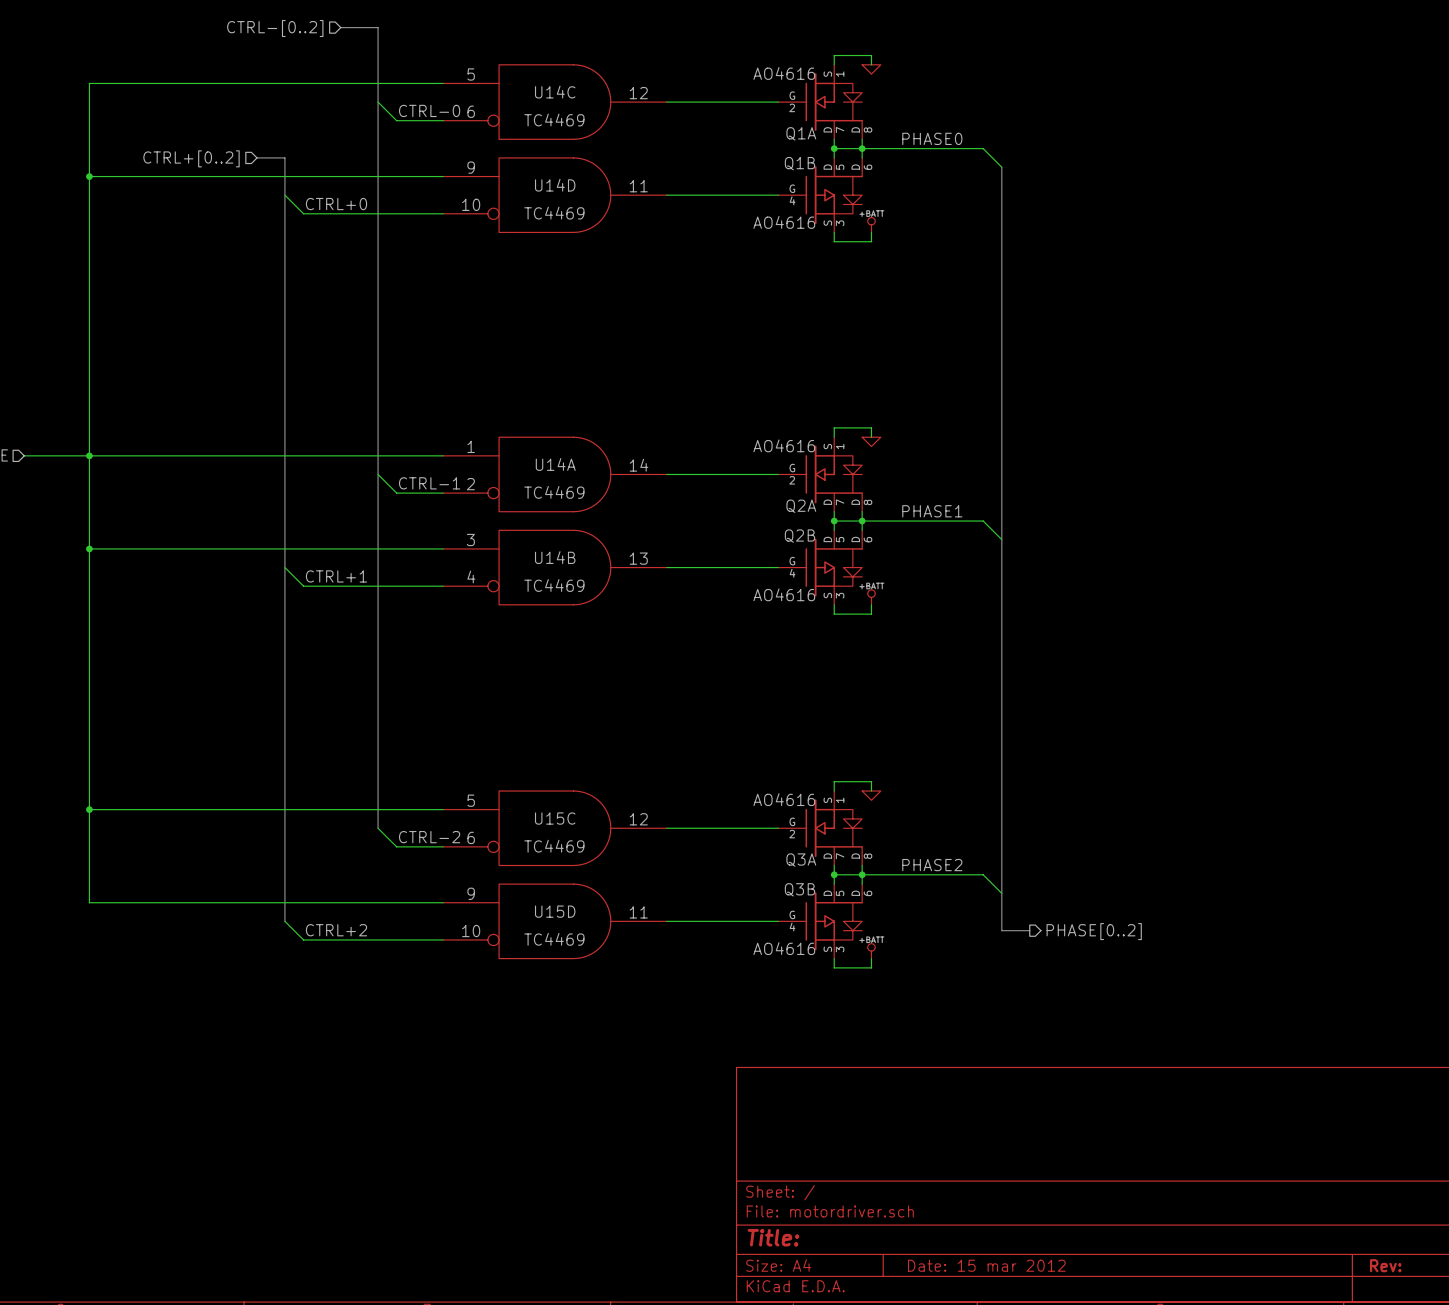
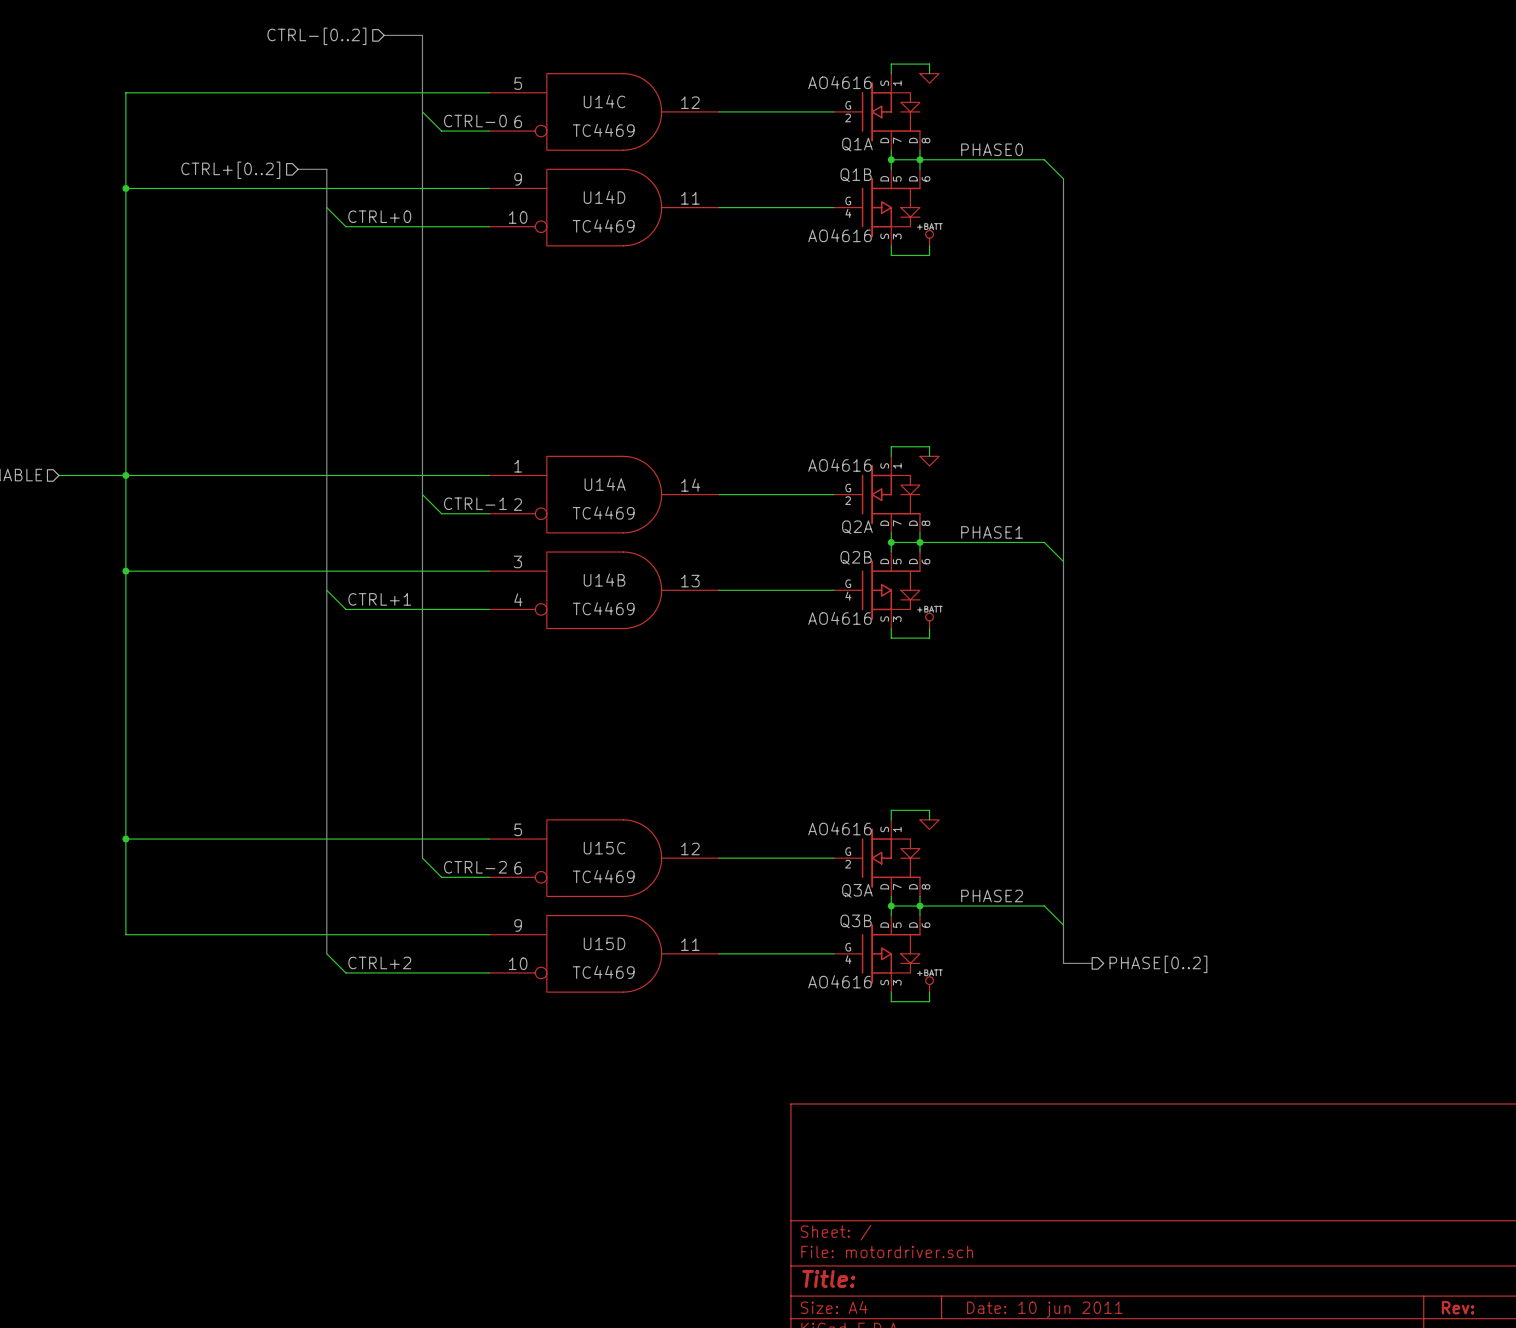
title block: Date: 15 mar 2012 (986, 1265) -> Date: 10 jun 2011 (1044, 1309)

